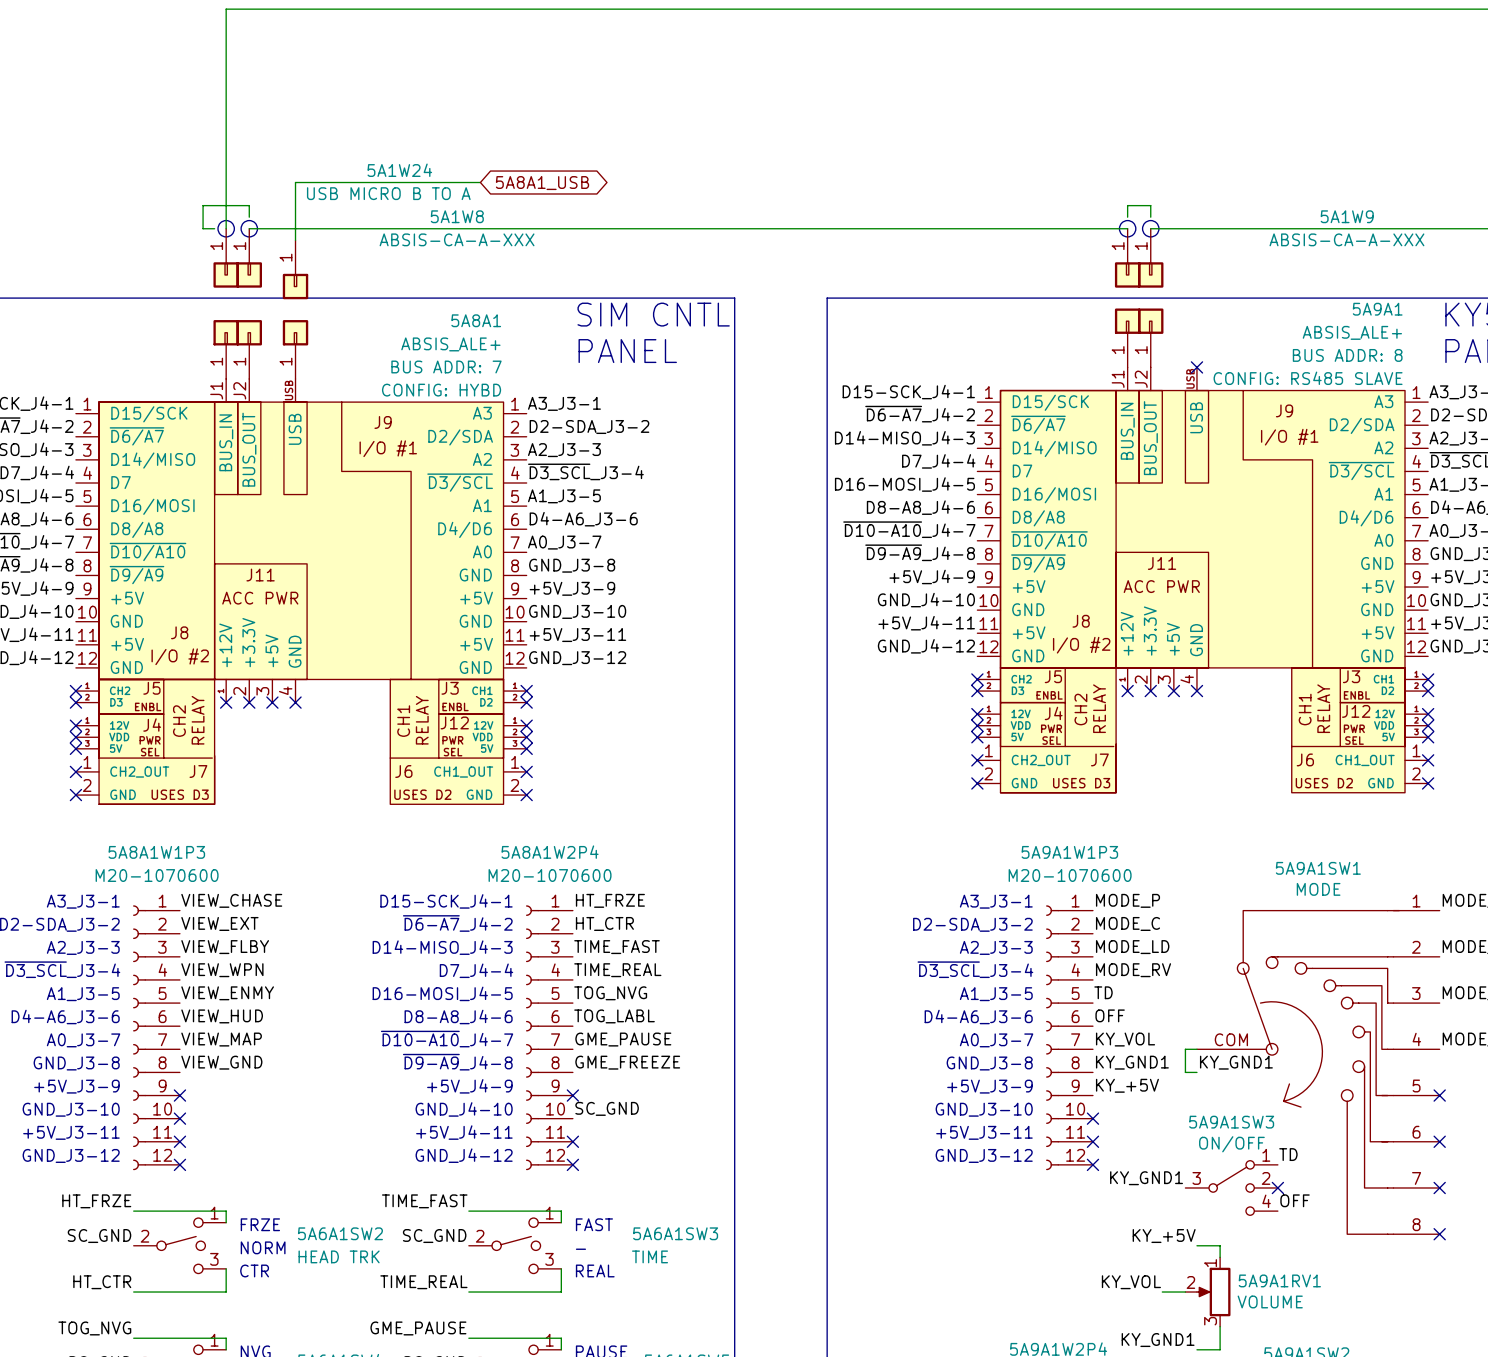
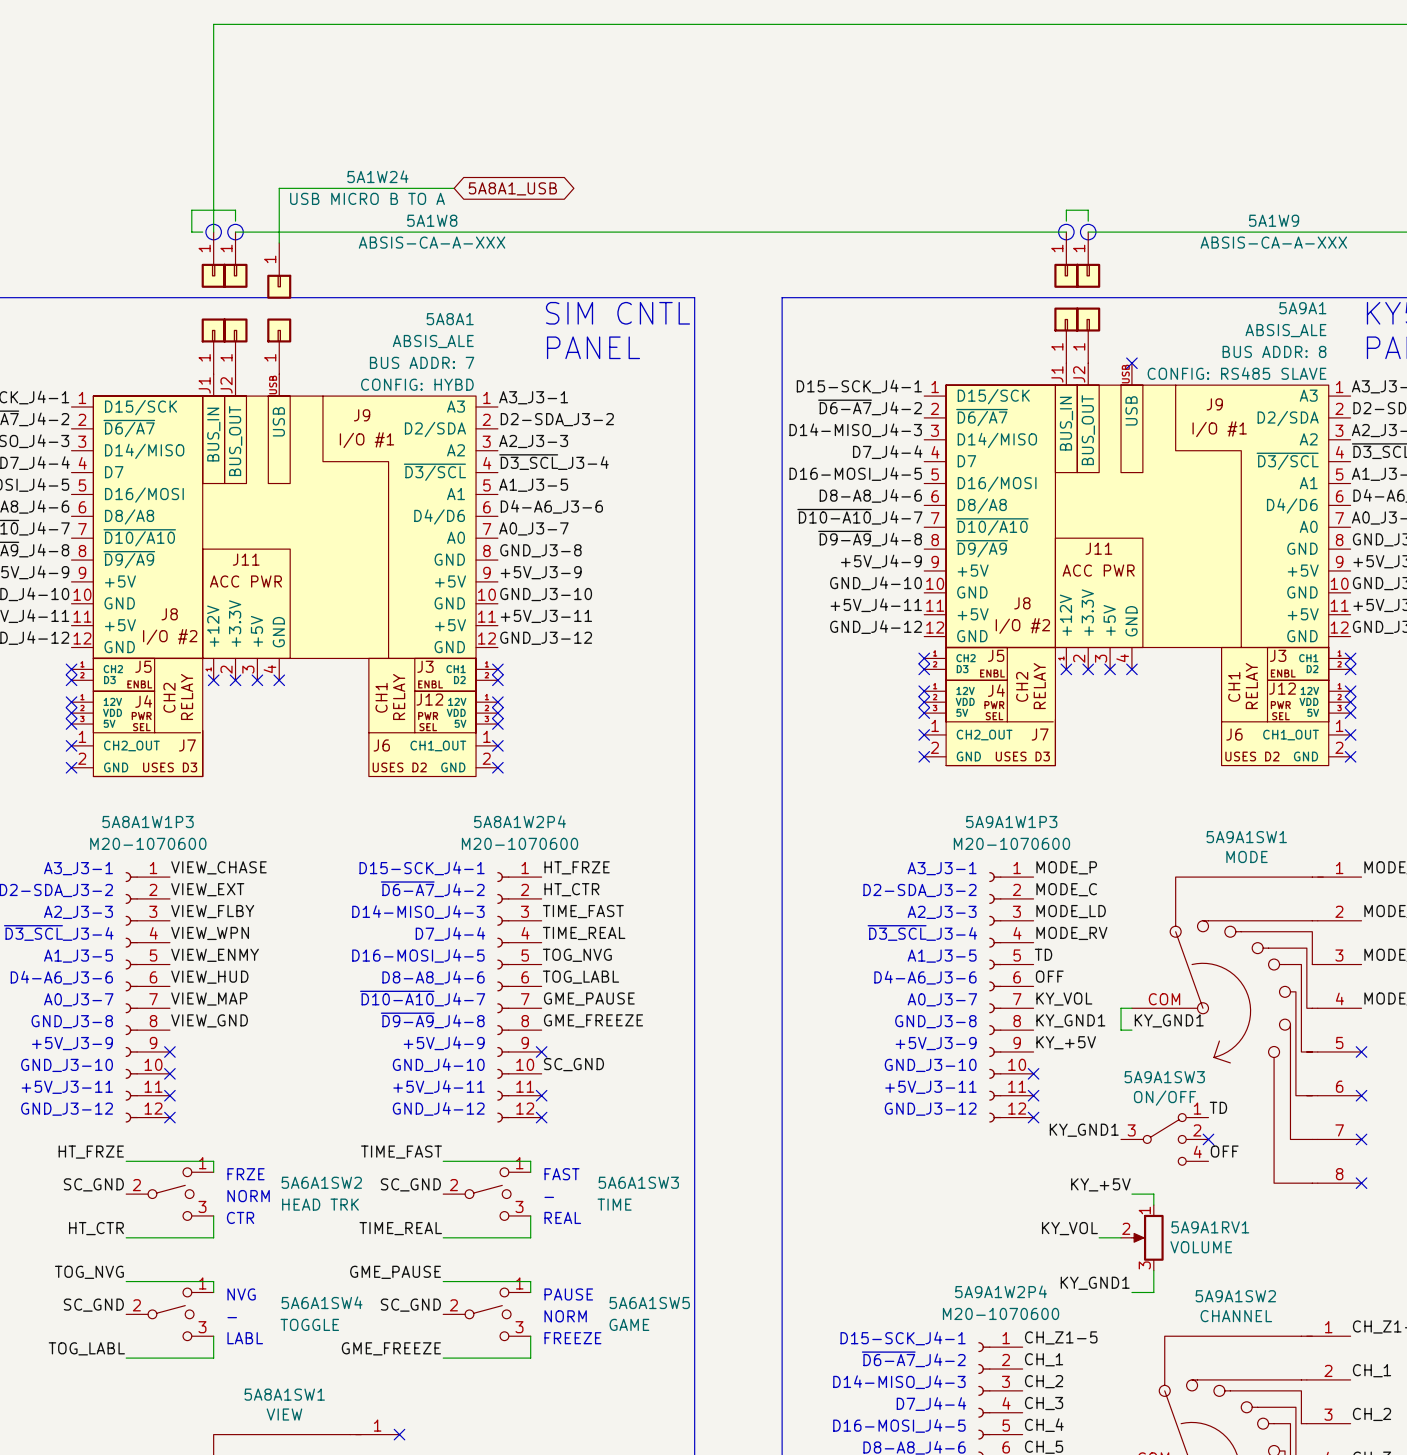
5A9A1 value: ABSIS_ALE+ (1352, 332) -> ABSIS_ALE (1285, 330)
5A8A1 value: ABSIS_ALE+ (450, 344) -> ABSIS_ALE (433, 341)

